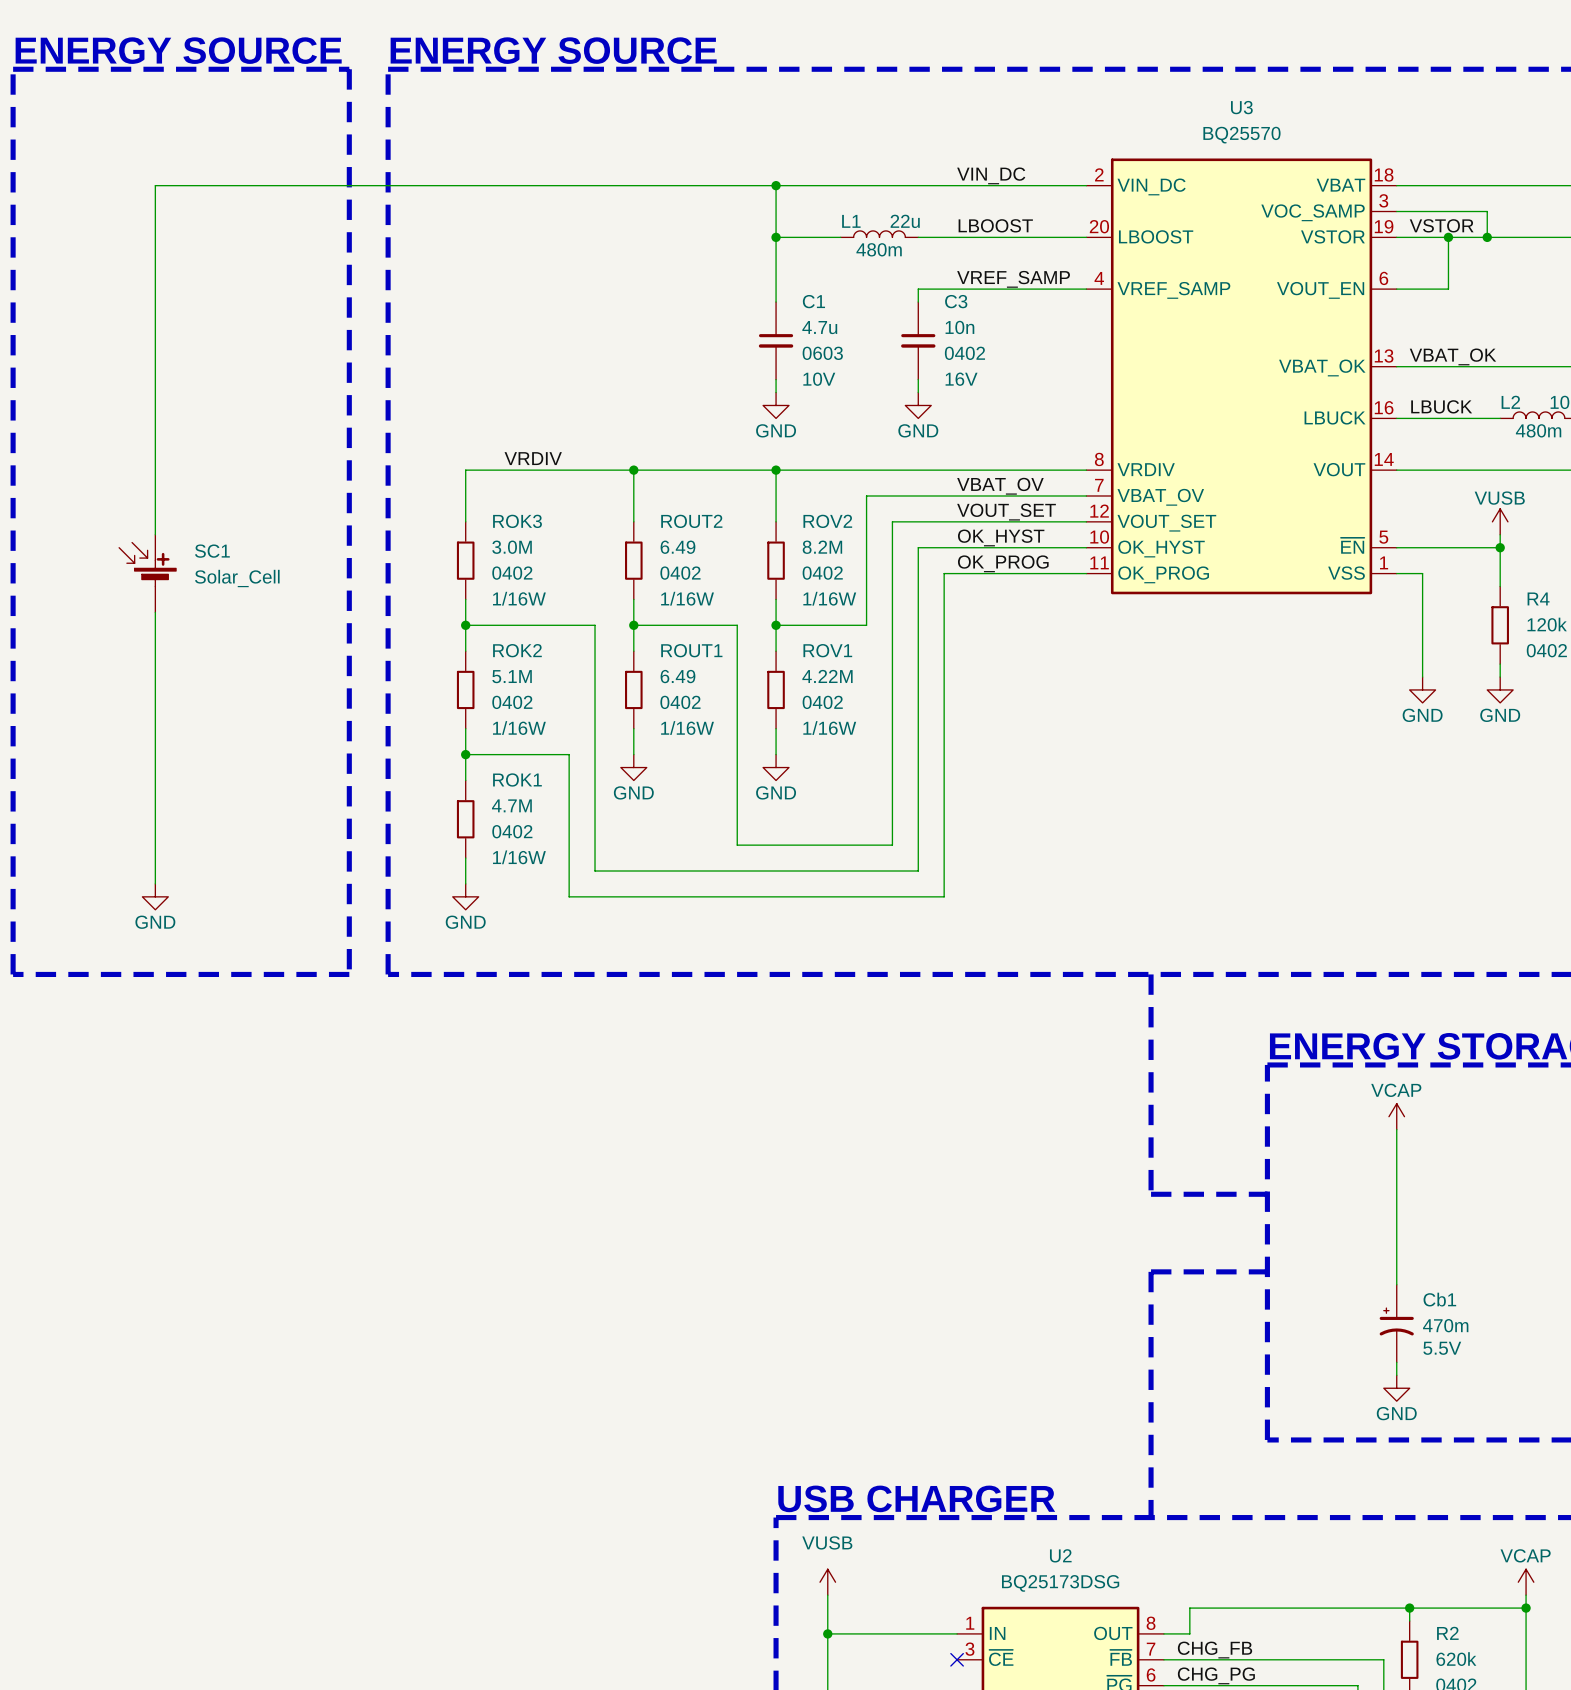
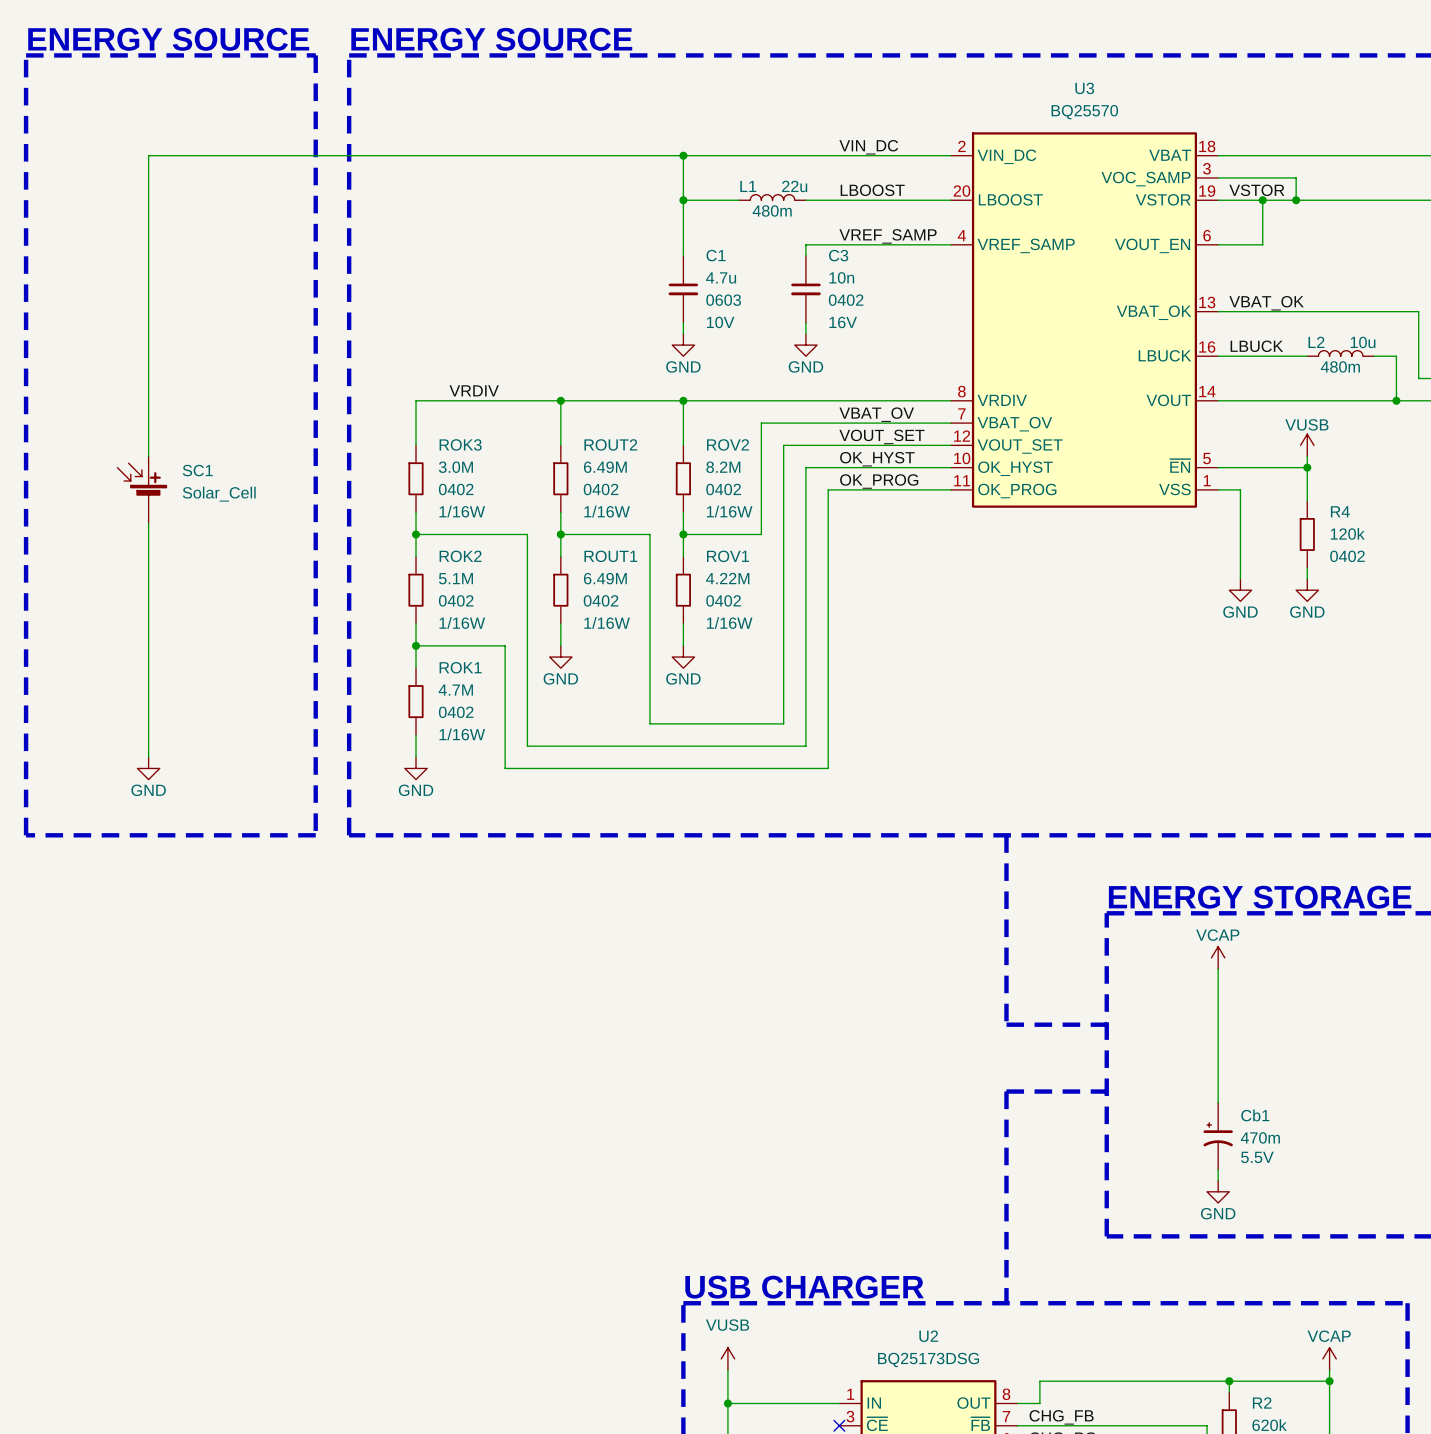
ROUT2 value: 6.49 (677, 547) -> 6.49M (605, 467)
ROUT1 value: 6.49 (677, 676) -> 6.49M (605, 578)

